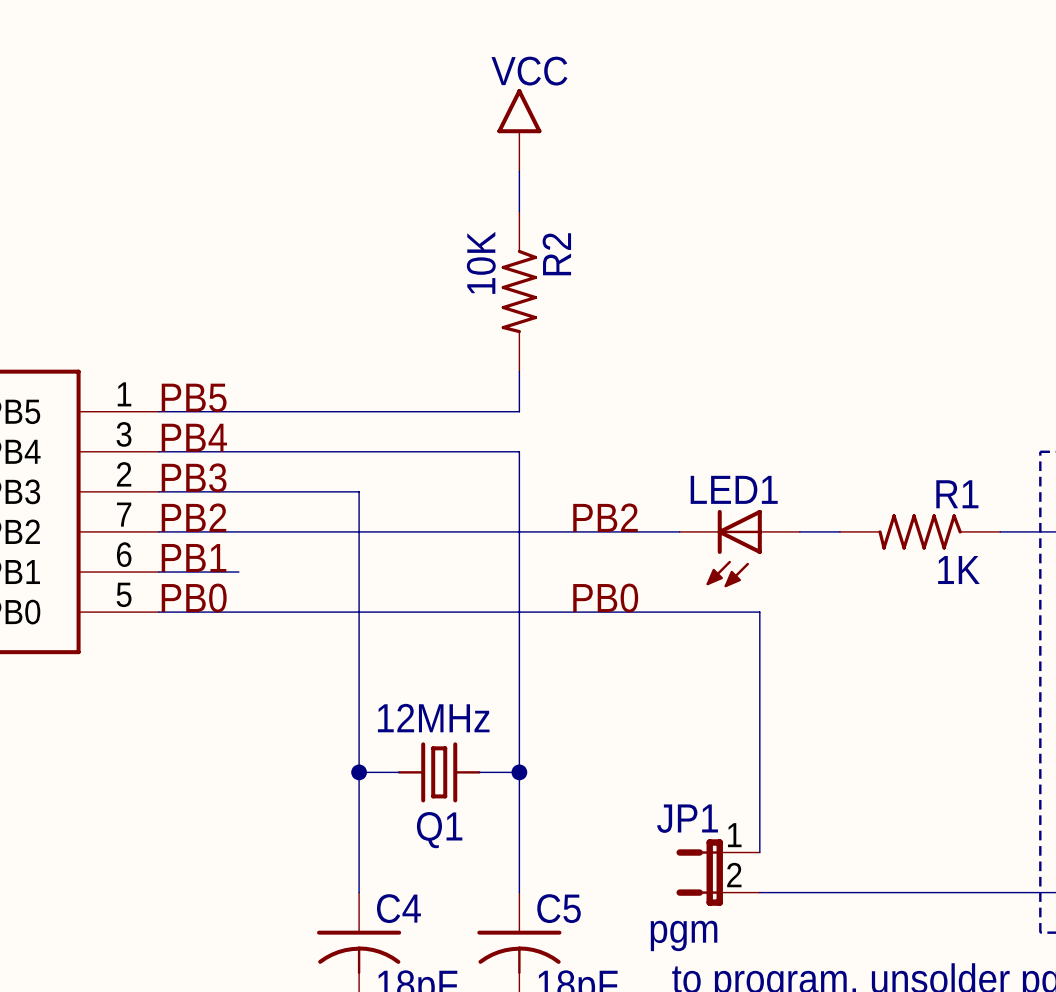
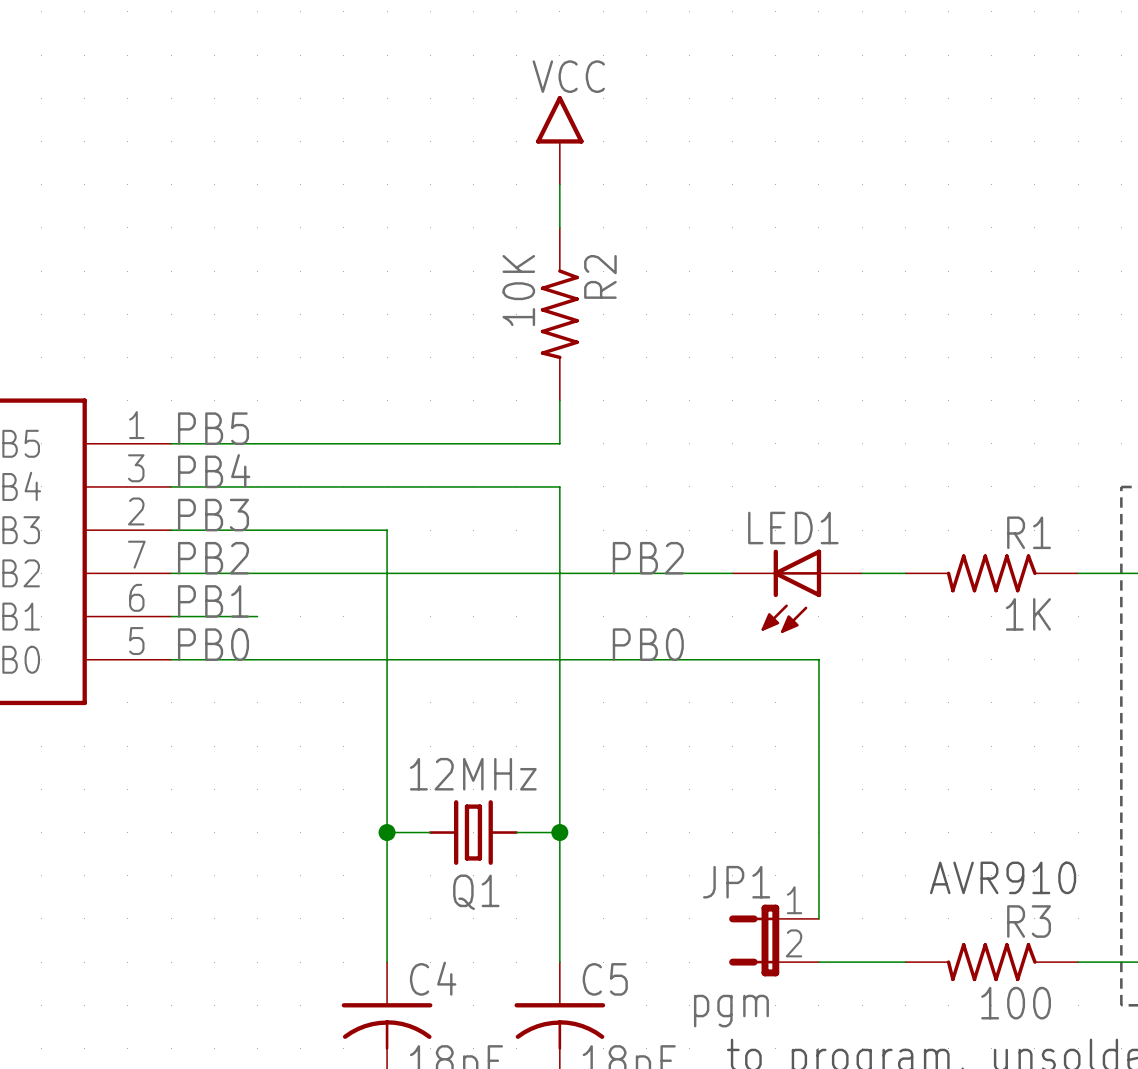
text: none -> AVR910 (1003, 877)
R3: none -> 100 (991, 962)

